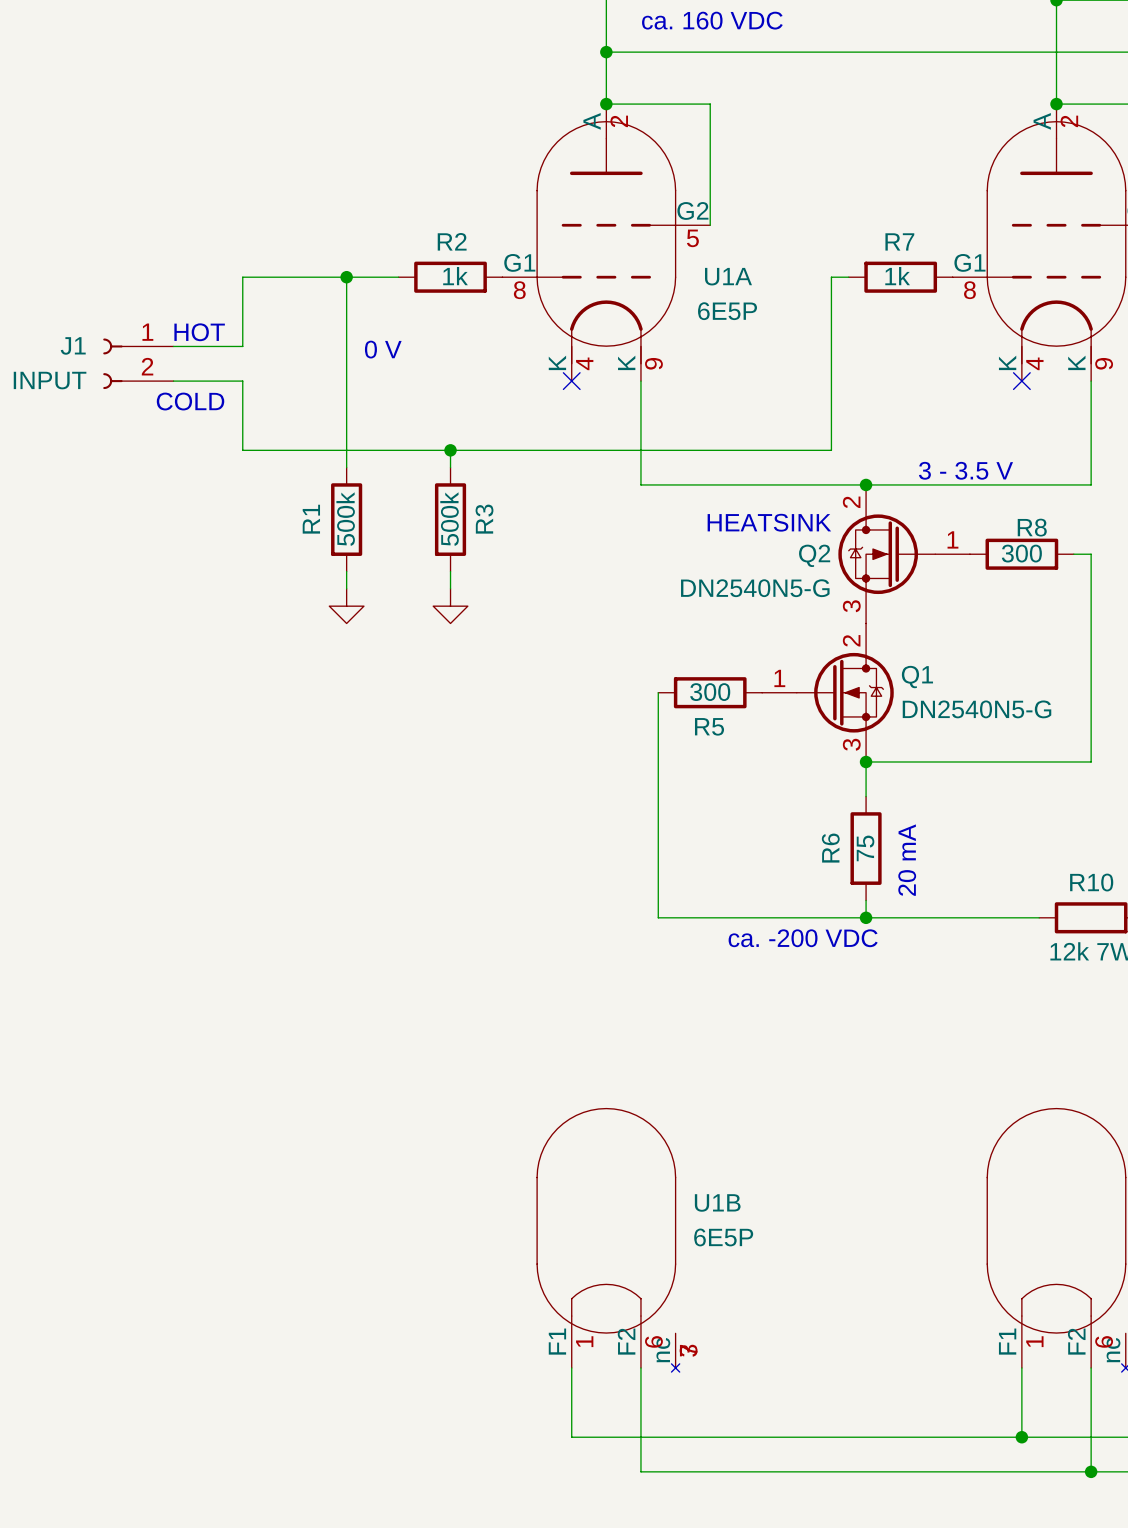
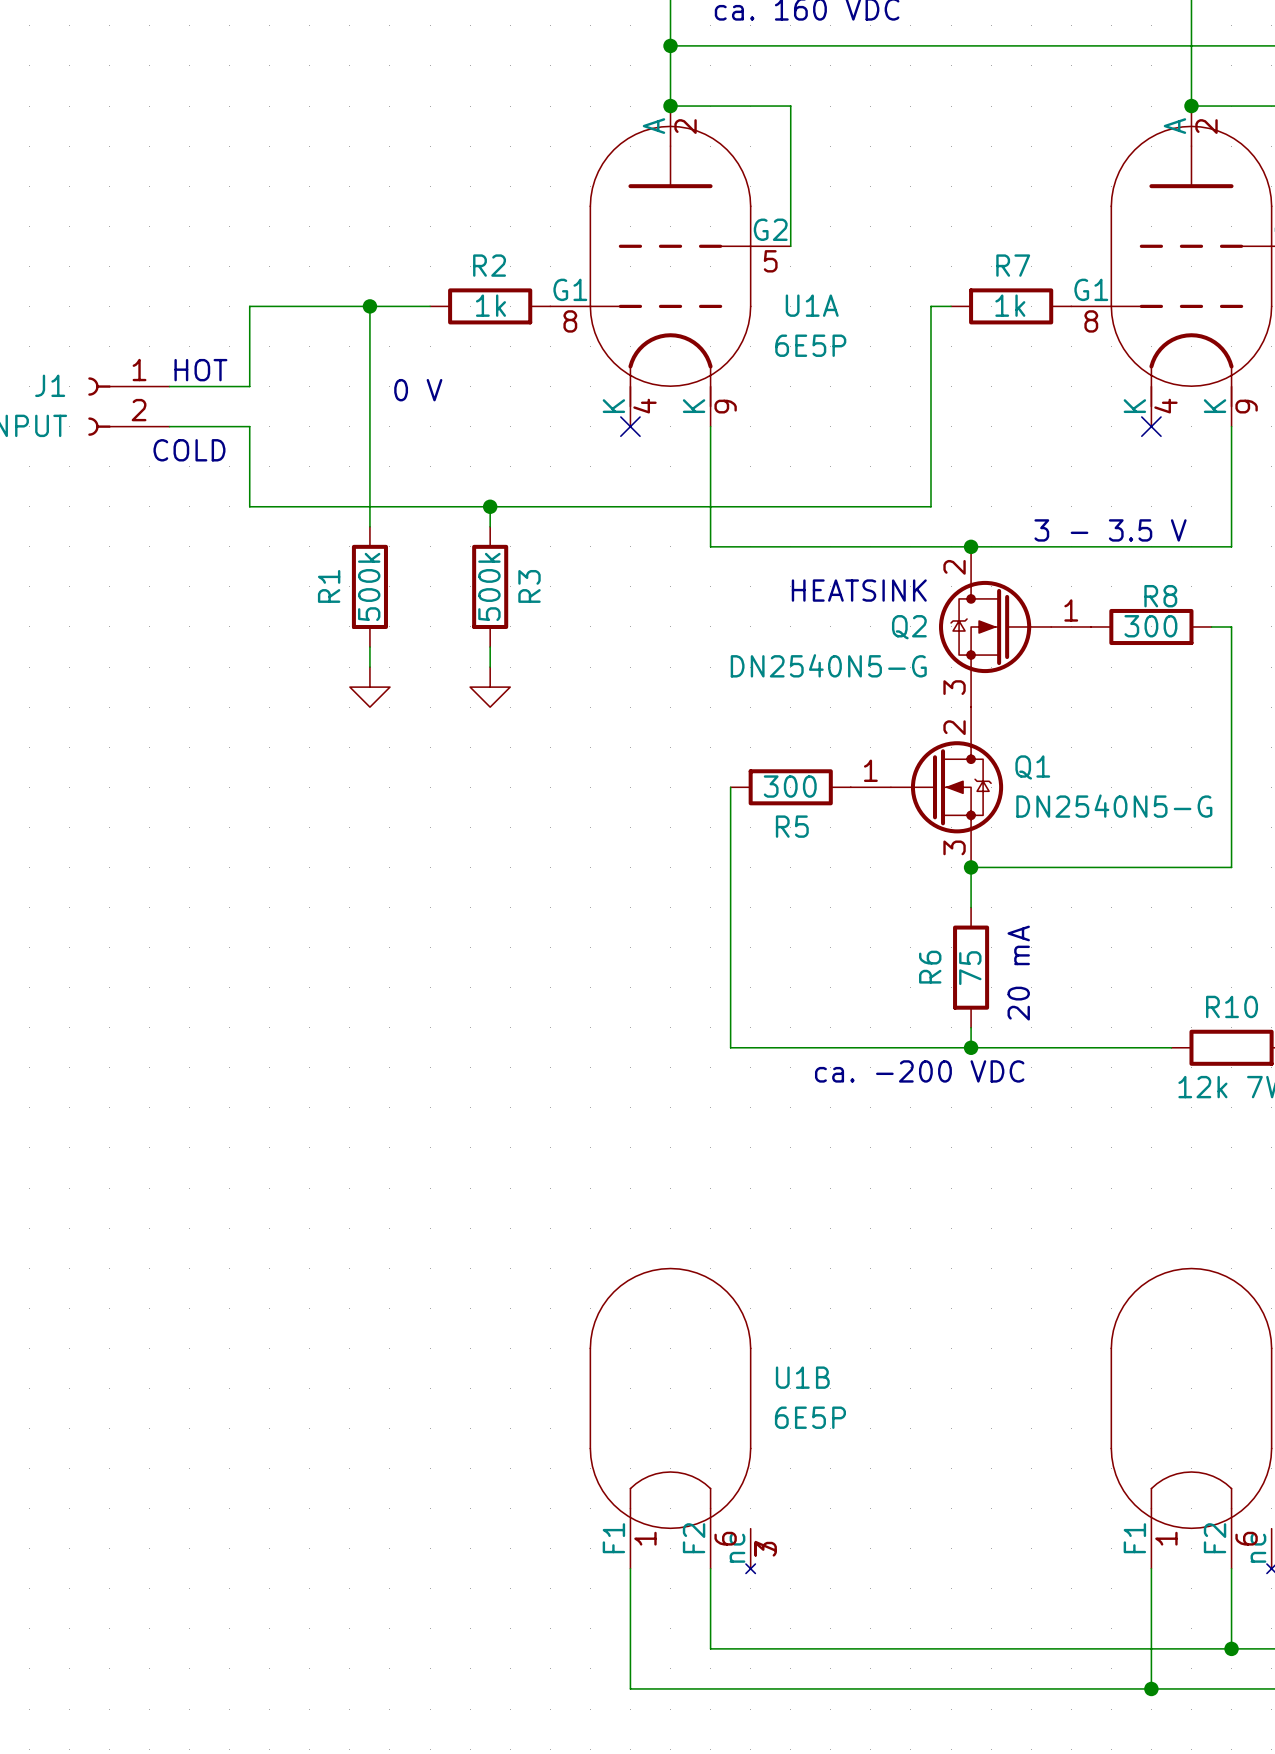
wire: (571, 1437) (640, 1437) (640, 1471) -> (630, 1648) (630, 1688) (710, 1688)
junction: (1021, 1437) -> none
wire: (1091, 1437) (1091, 1471) -> (1151, 1648) (1151, 1688)
junction: none -> (1231, 1648)
junction: none -> (1151, 1688)
junction: (1091, 1471) -> none

